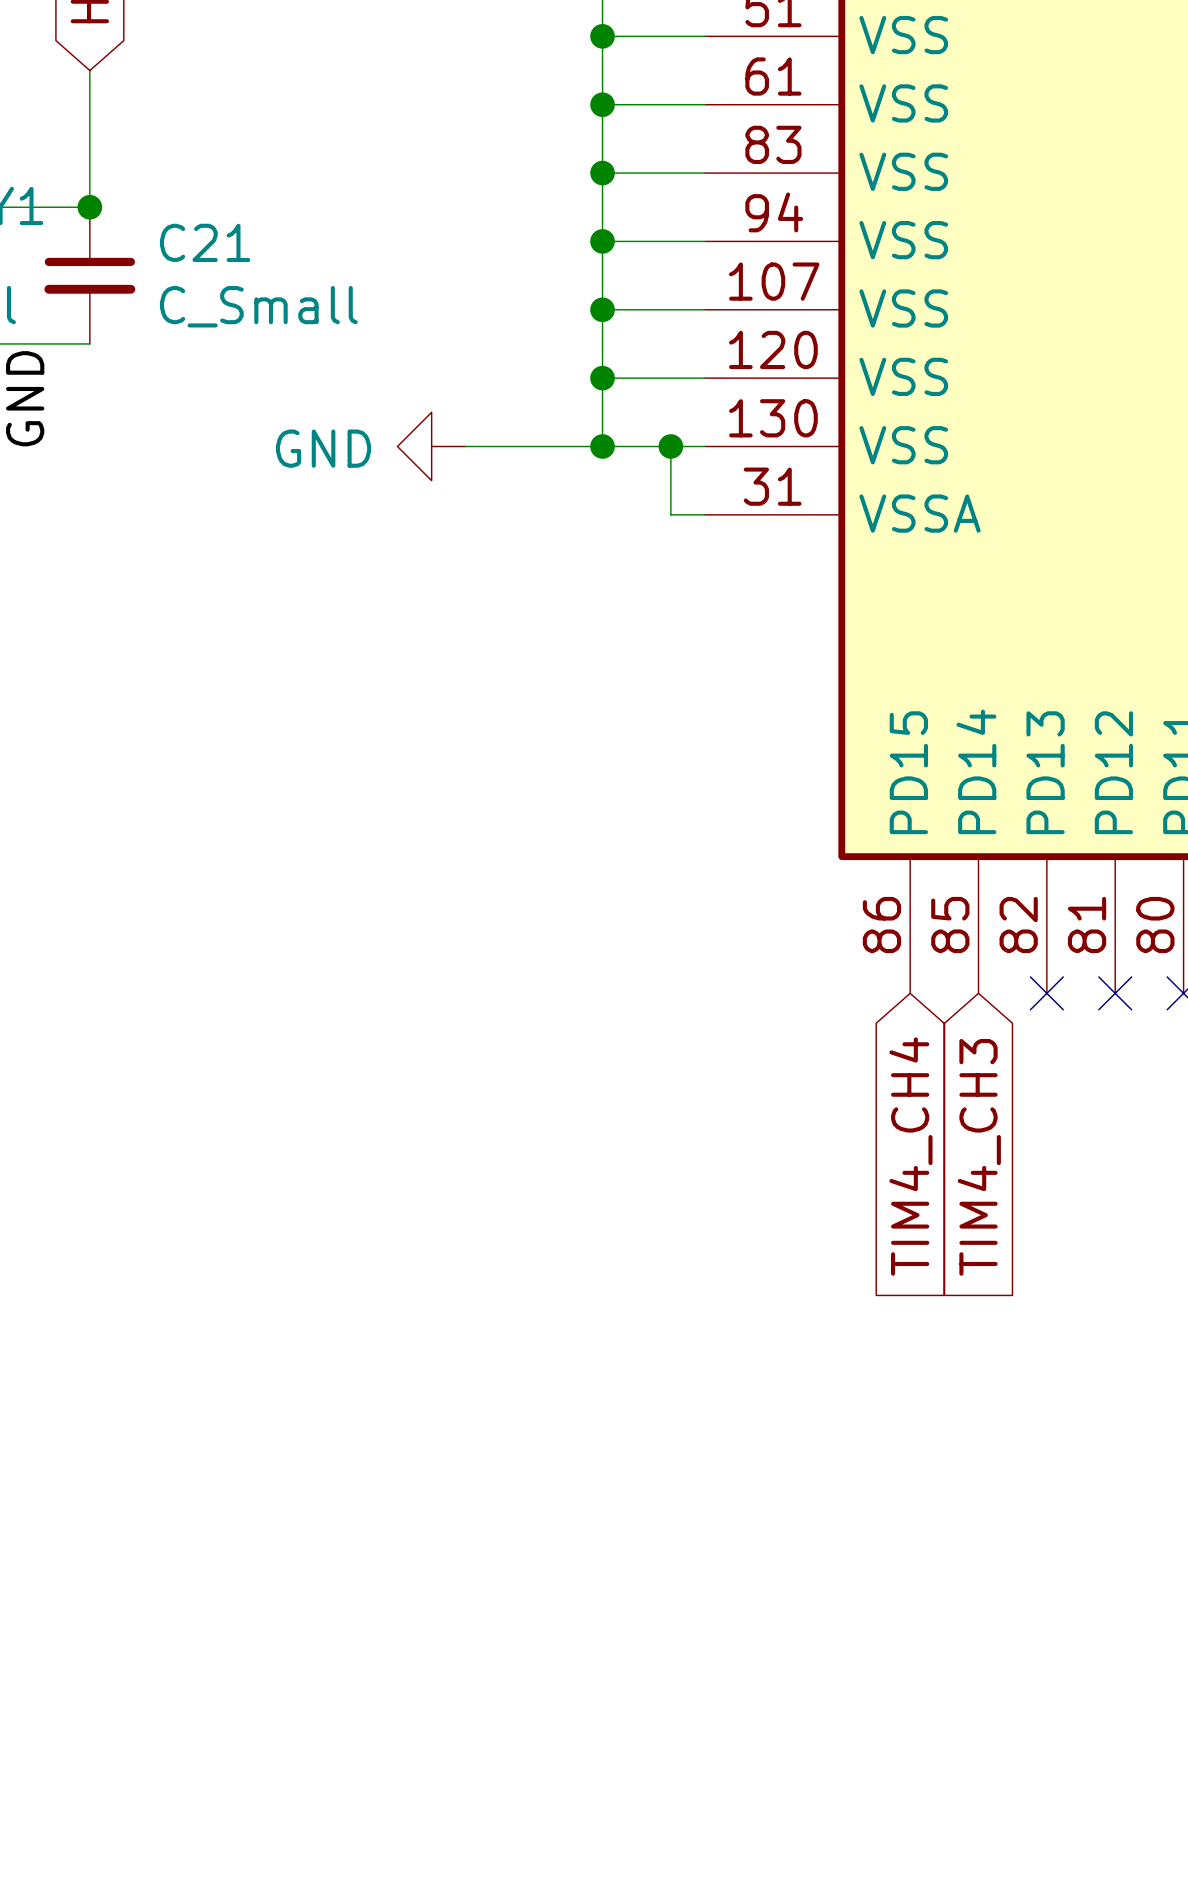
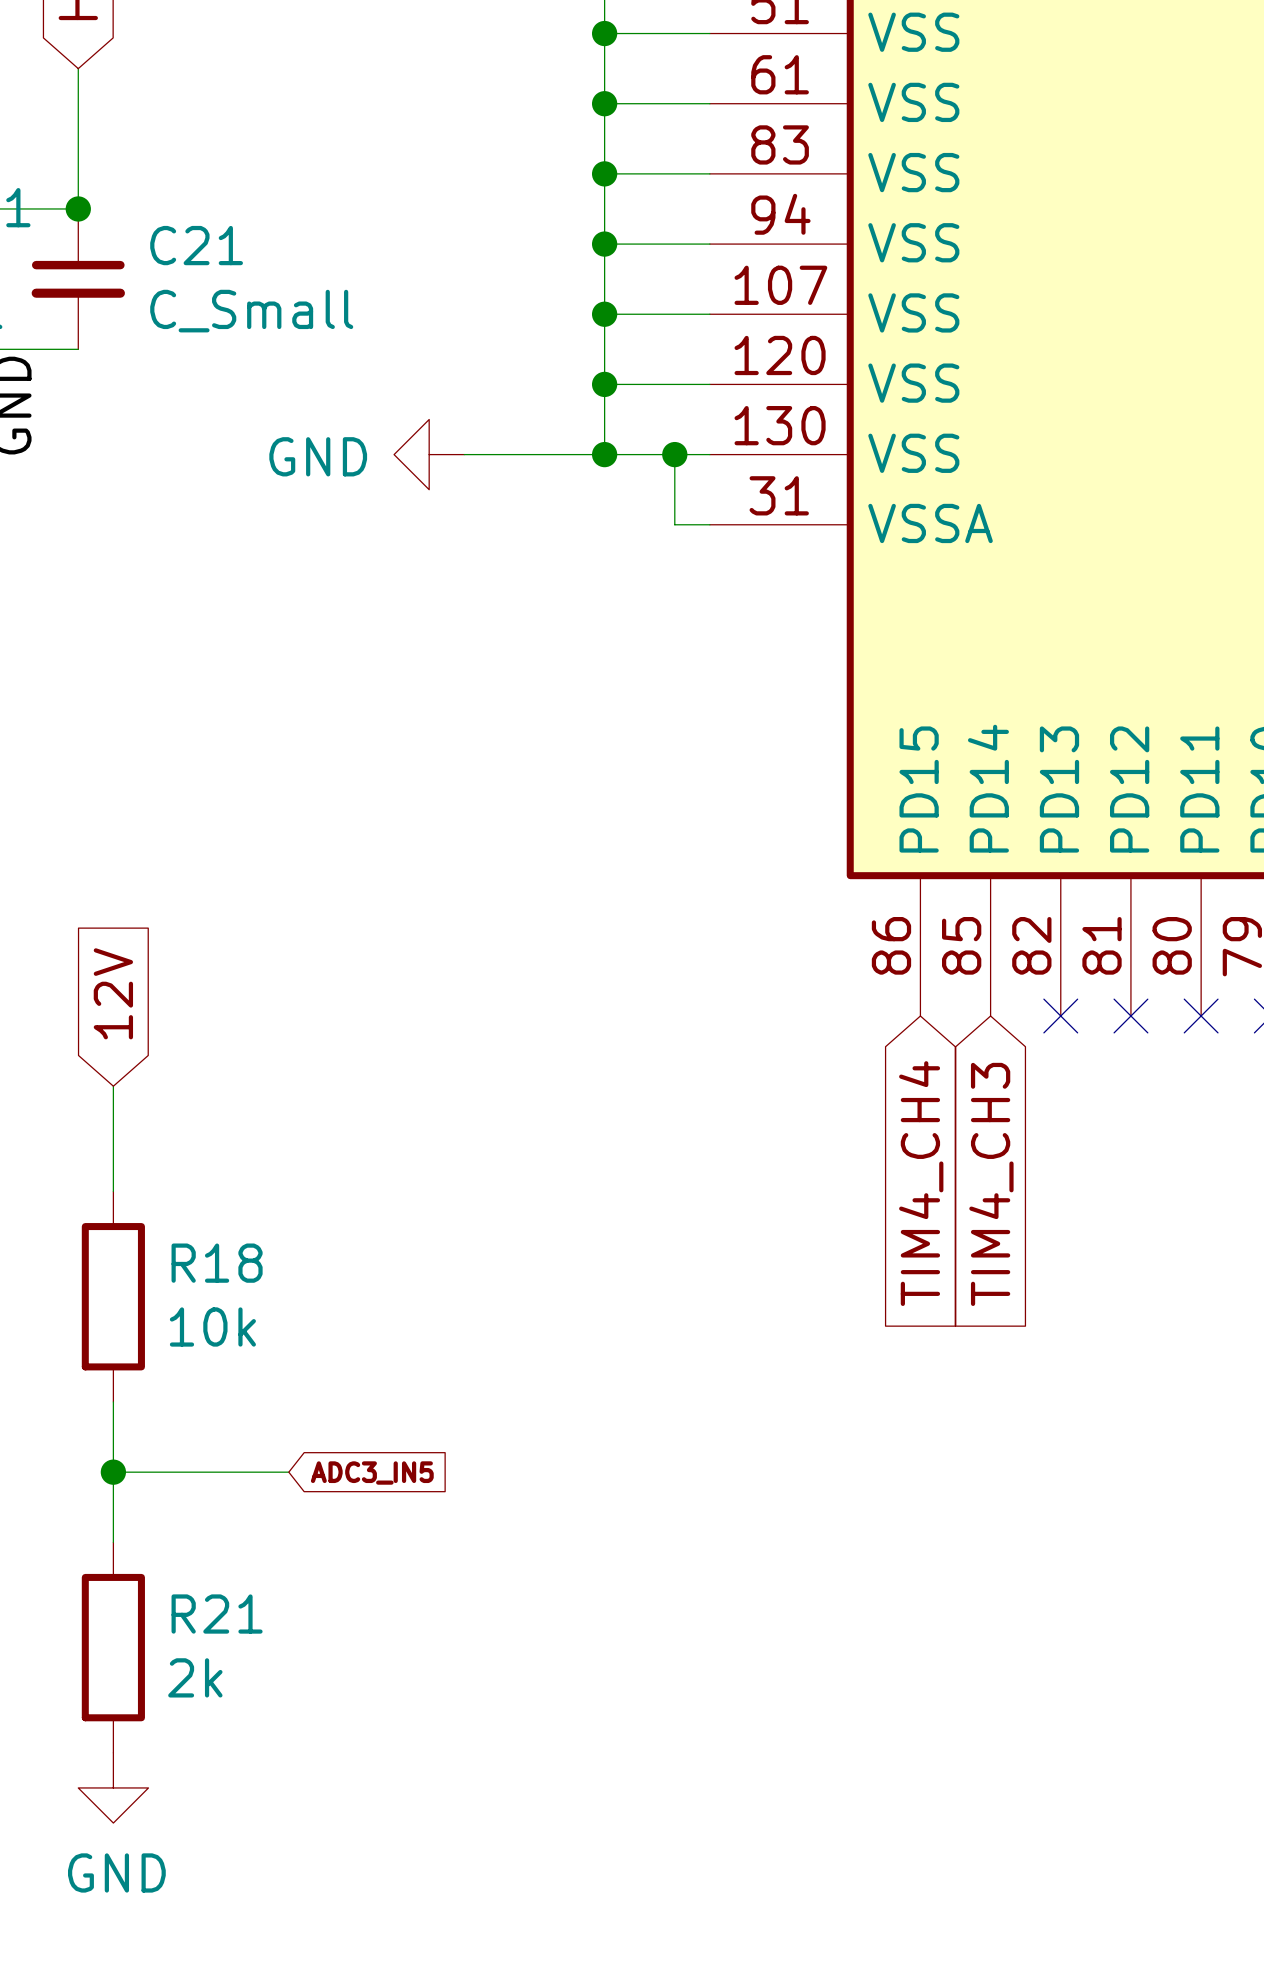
global label: none -> 12V (113, 993)
wire: none -> (113, 1086) (113, 1191)
R18: none -> 10k (113, 1296)
wire: none -> (113, 1401) (113, 1542)
wire: none -> (113, 1472) (288, 1472)
junction: none -> (113, 1472)
global label: none -> ADC3_IN5 (372, 1473)
R21: none -> 2k (113, 1647)
power symbol: none -> GND (113, 1787)

